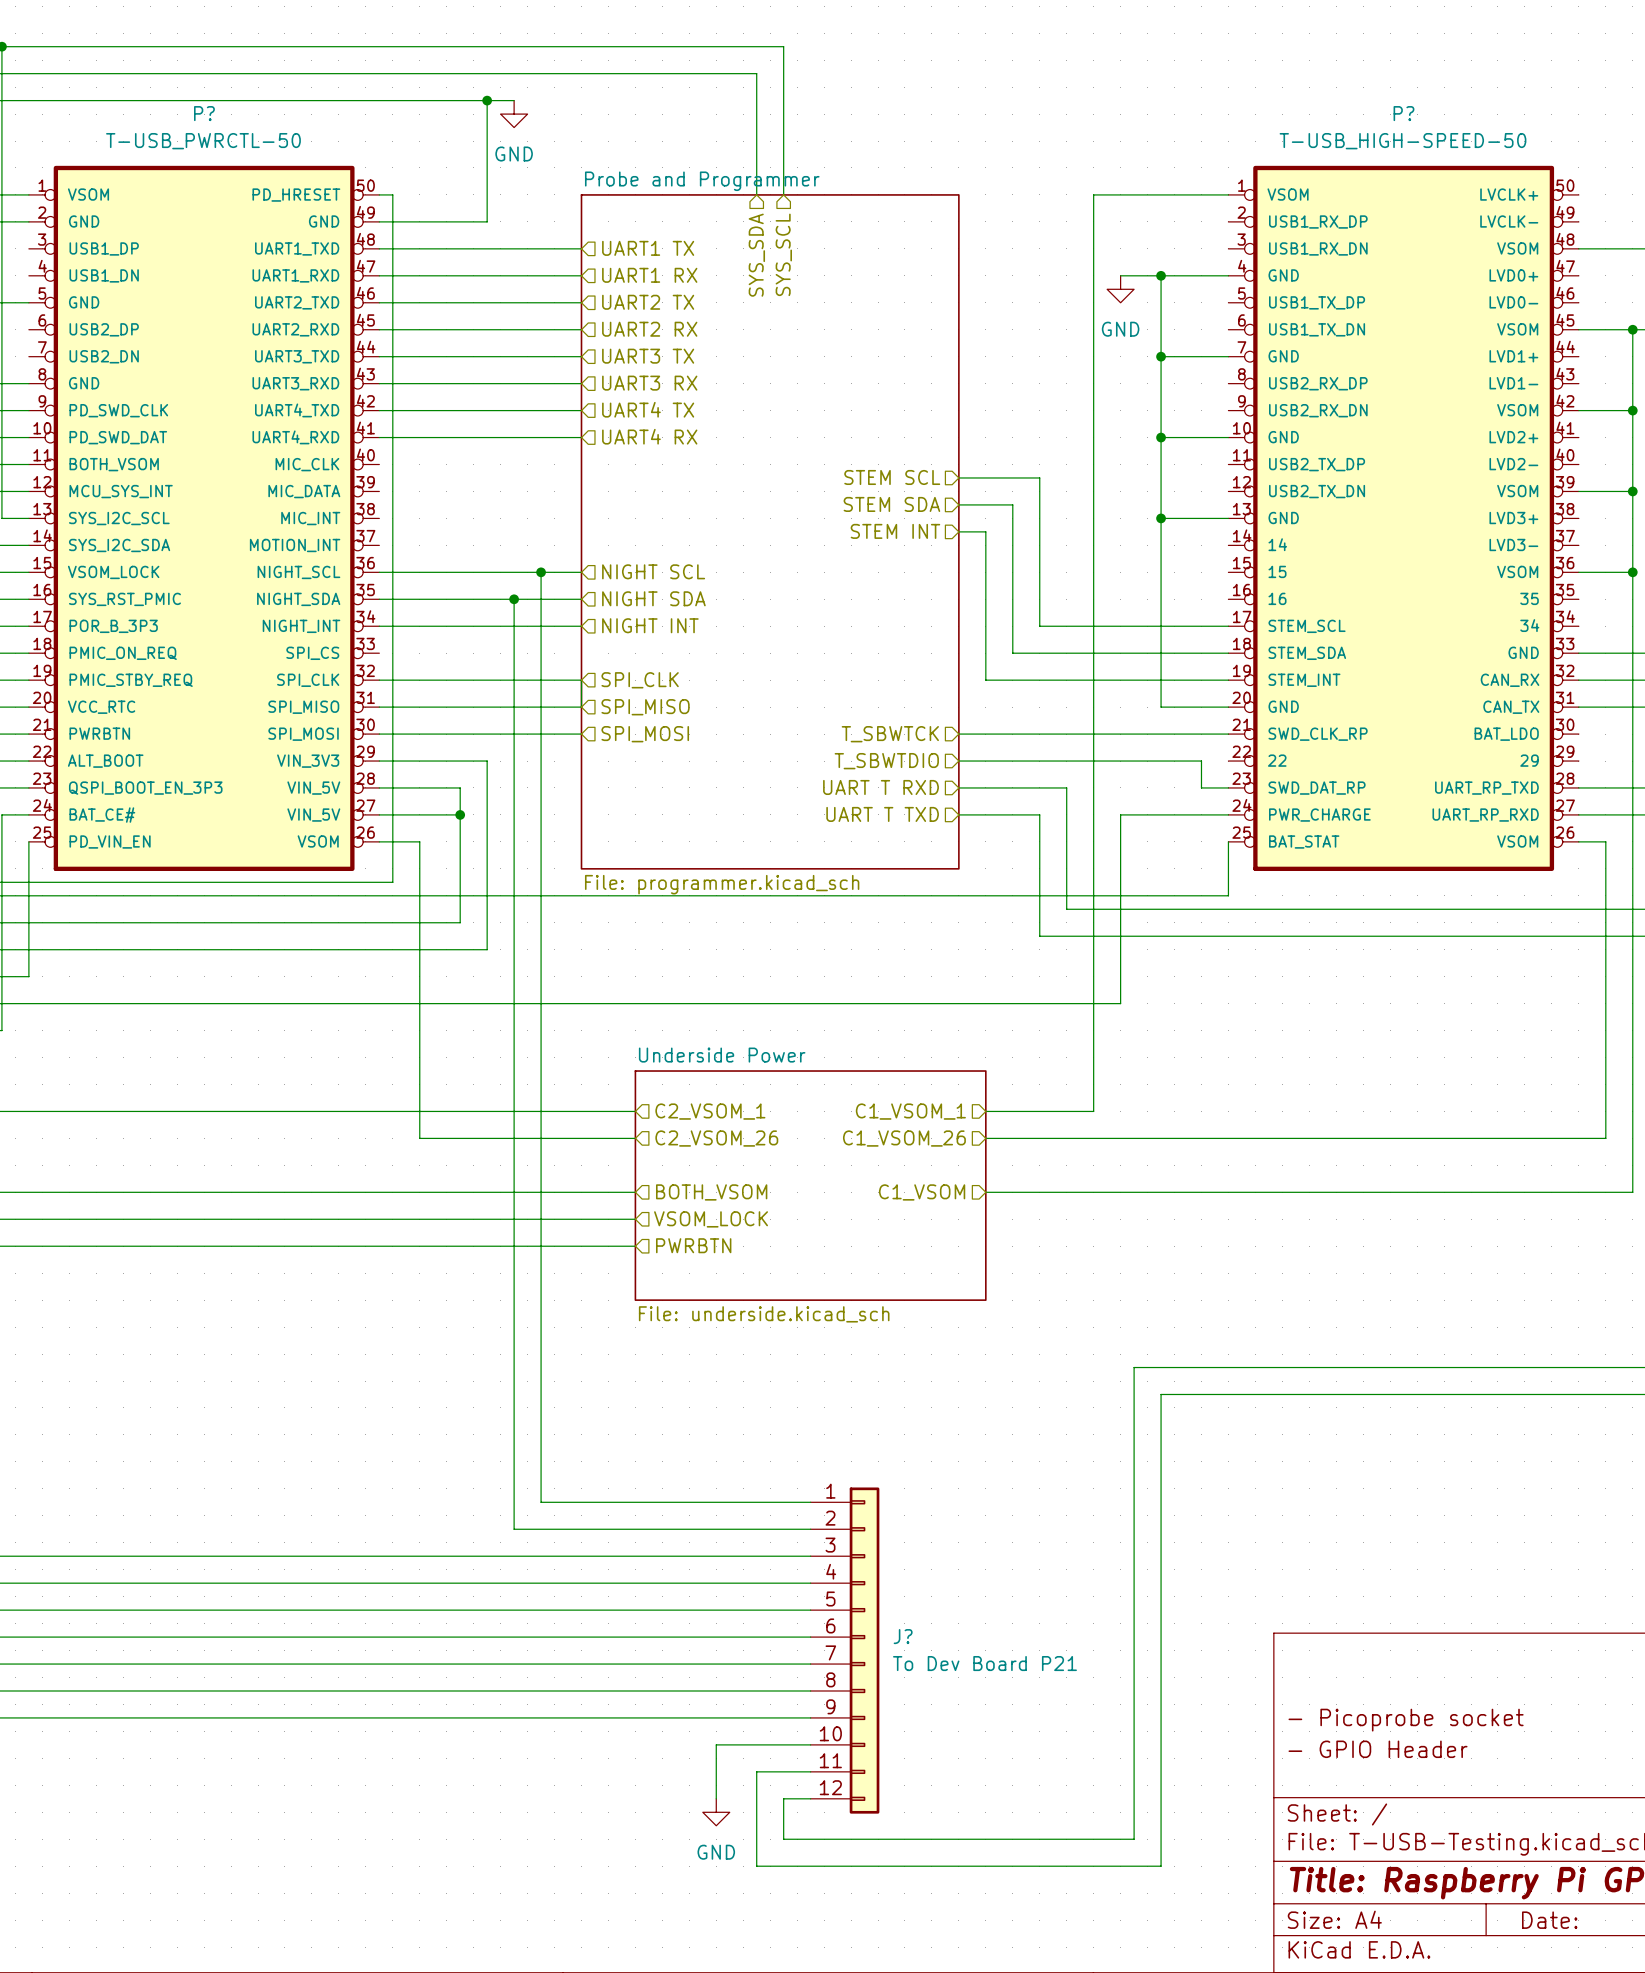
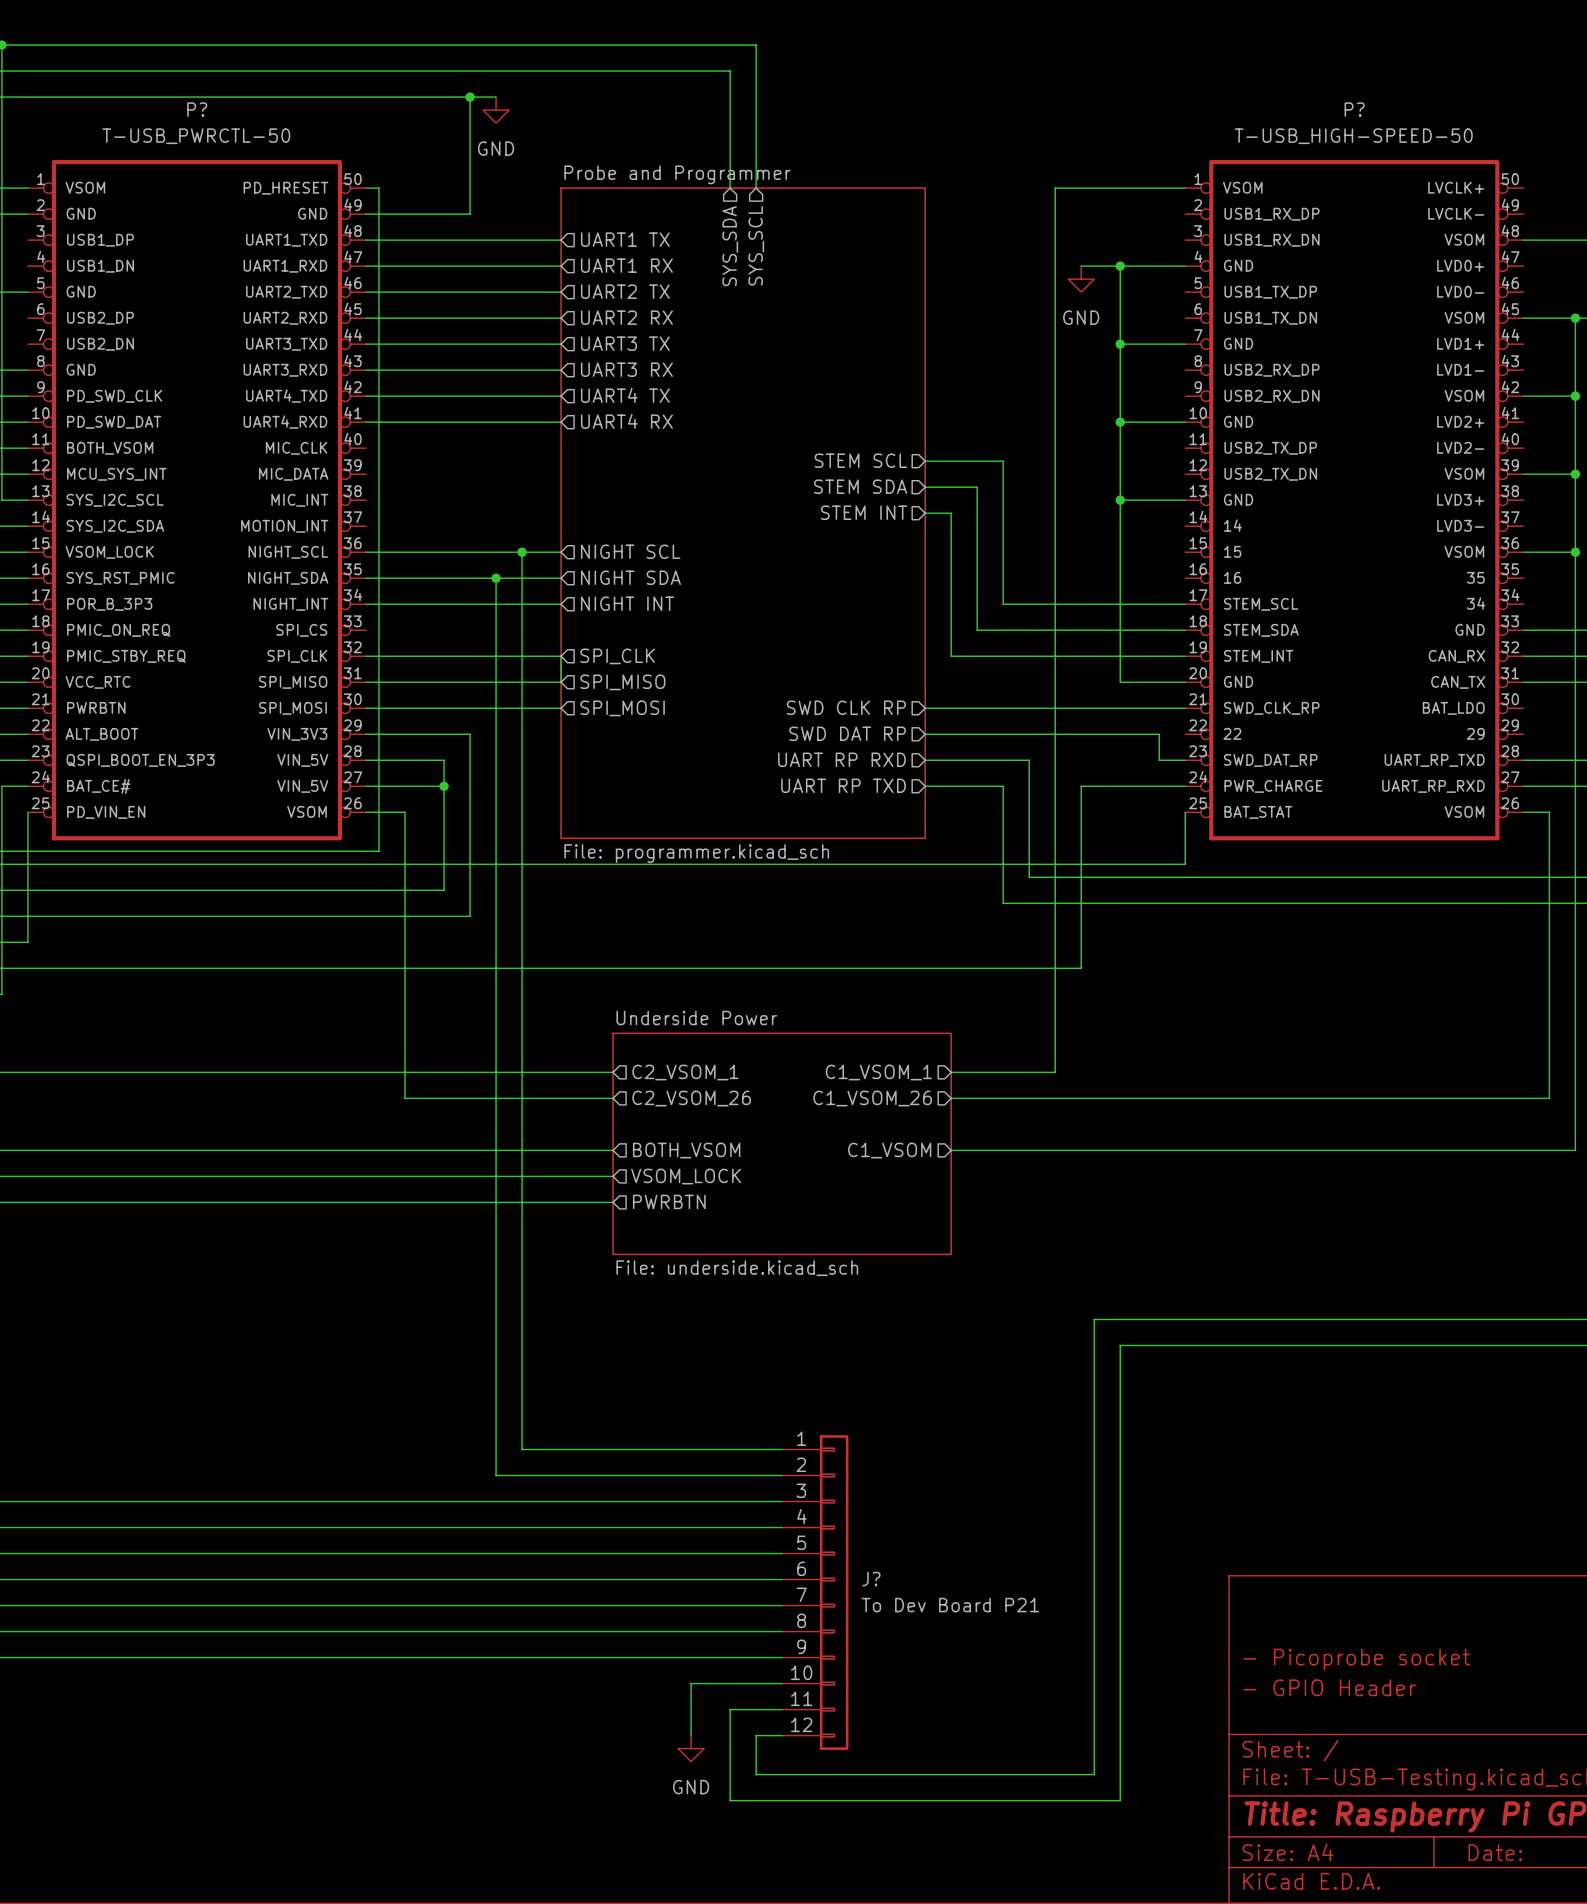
hierarchical label: T_SBWTCK (890, 734) -> SWD CLK RP (846, 707)
hierarchical label: T_SBWTDIO (886, 761) -> SWD DAT RP (847, 733)
hierarchical label: UART T RXD (881, 787) -> UART RP RXD (841, 759)
hierarchical label: UART T TXD (882, 814) -> UART RP TXD (843, 785)

